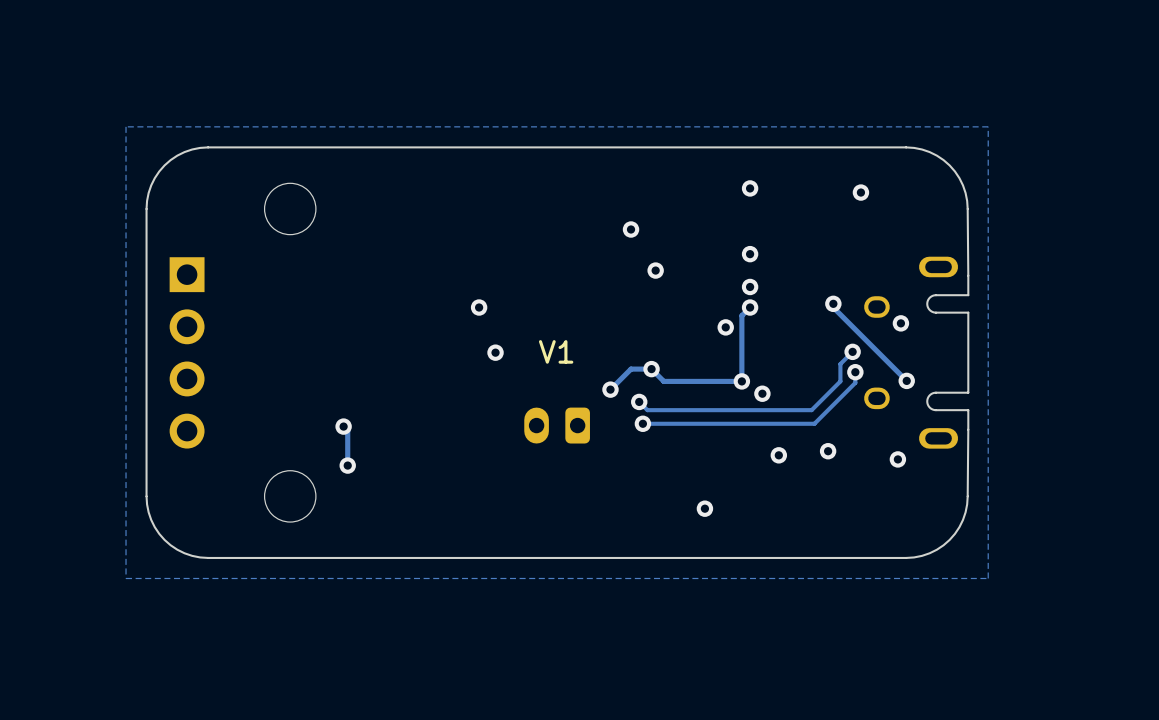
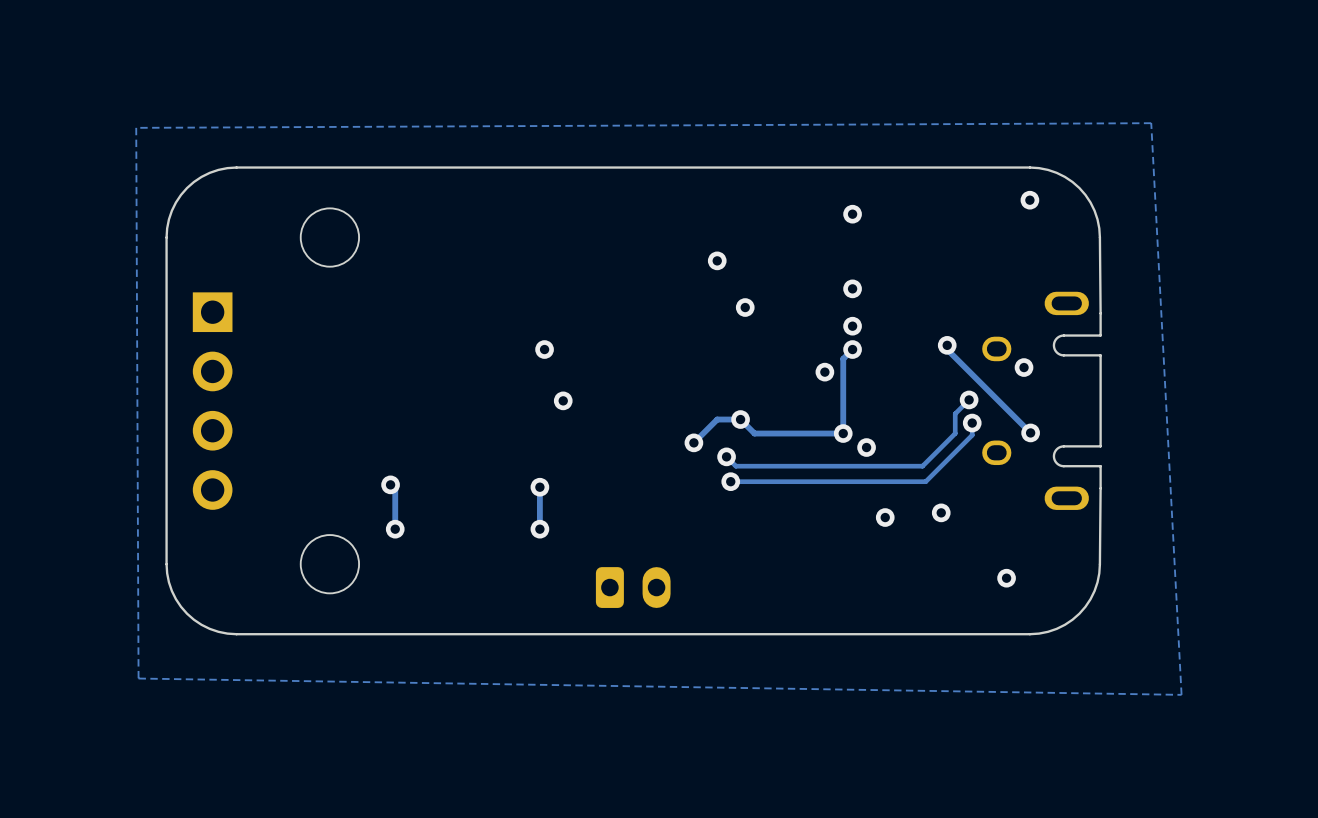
zone outline: (988, 126) (988, 578) (126, 578) (126, 126) (988, 126) -> (1151, 123) (1181, 694) (138, 678) (136, 127) (1151, 123)
via position: (860, 192) -> (1029, 200)
text: V1 (556, 351) -> none
part rotation: 0° (557, 425) -> 180° (633, 587)
part position: (557, 425) -> (633, 587)
track: none -> (539, 487) (539, 529)
via: none -> (539, 487)
via position: (897, 459) -> (1006, 578)
via: none -> (539, 529)
via: (704, 508) -> none

